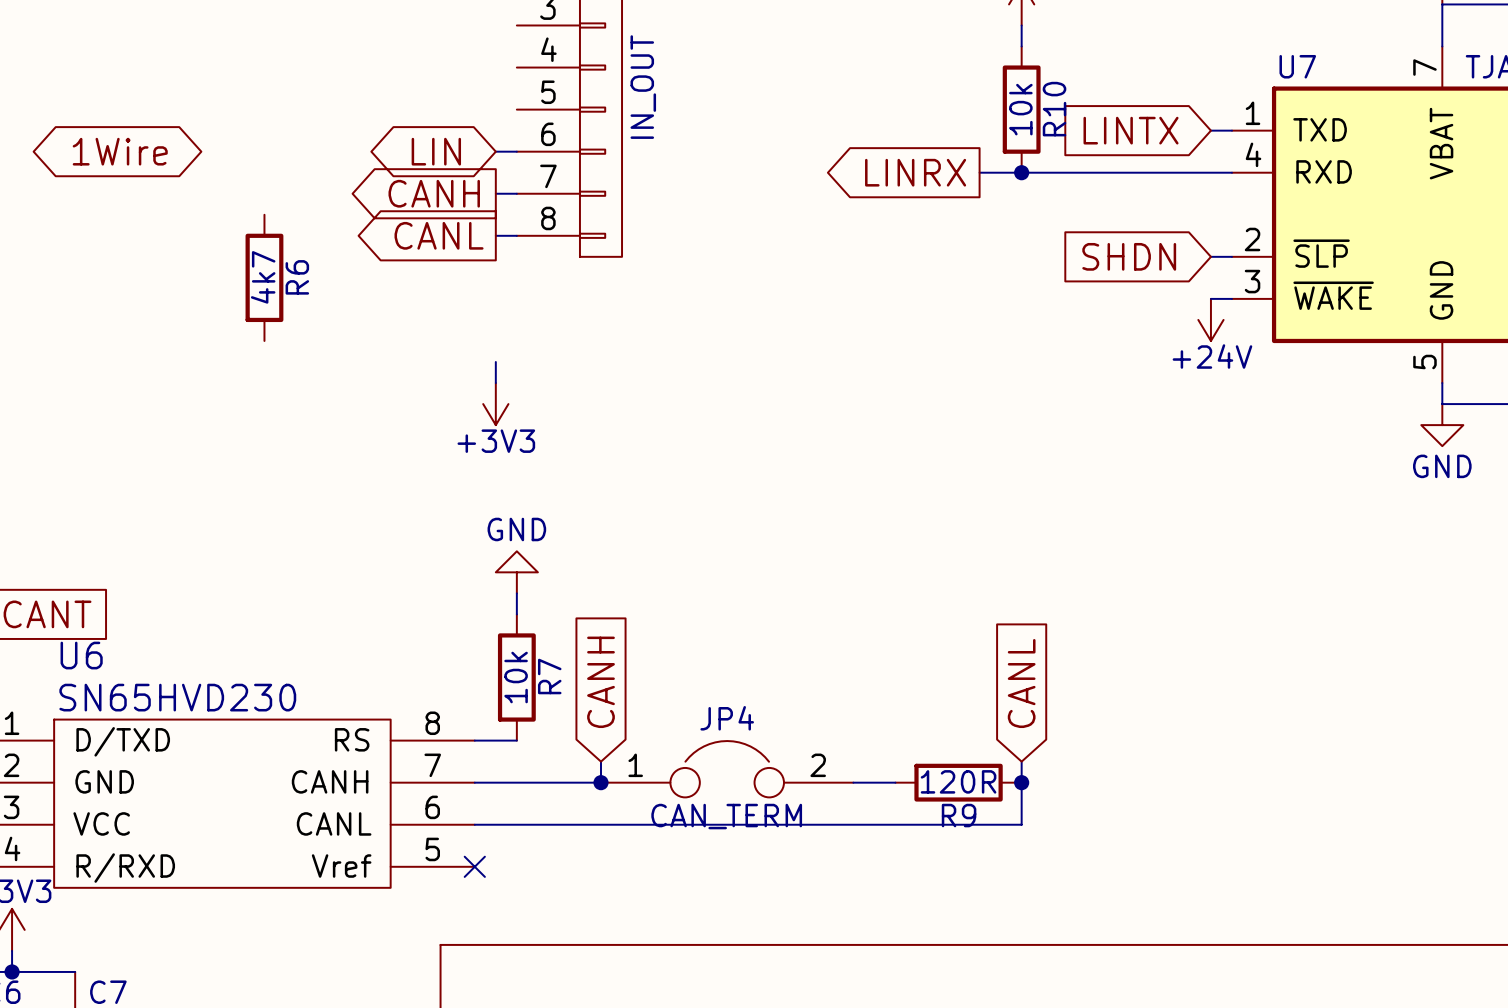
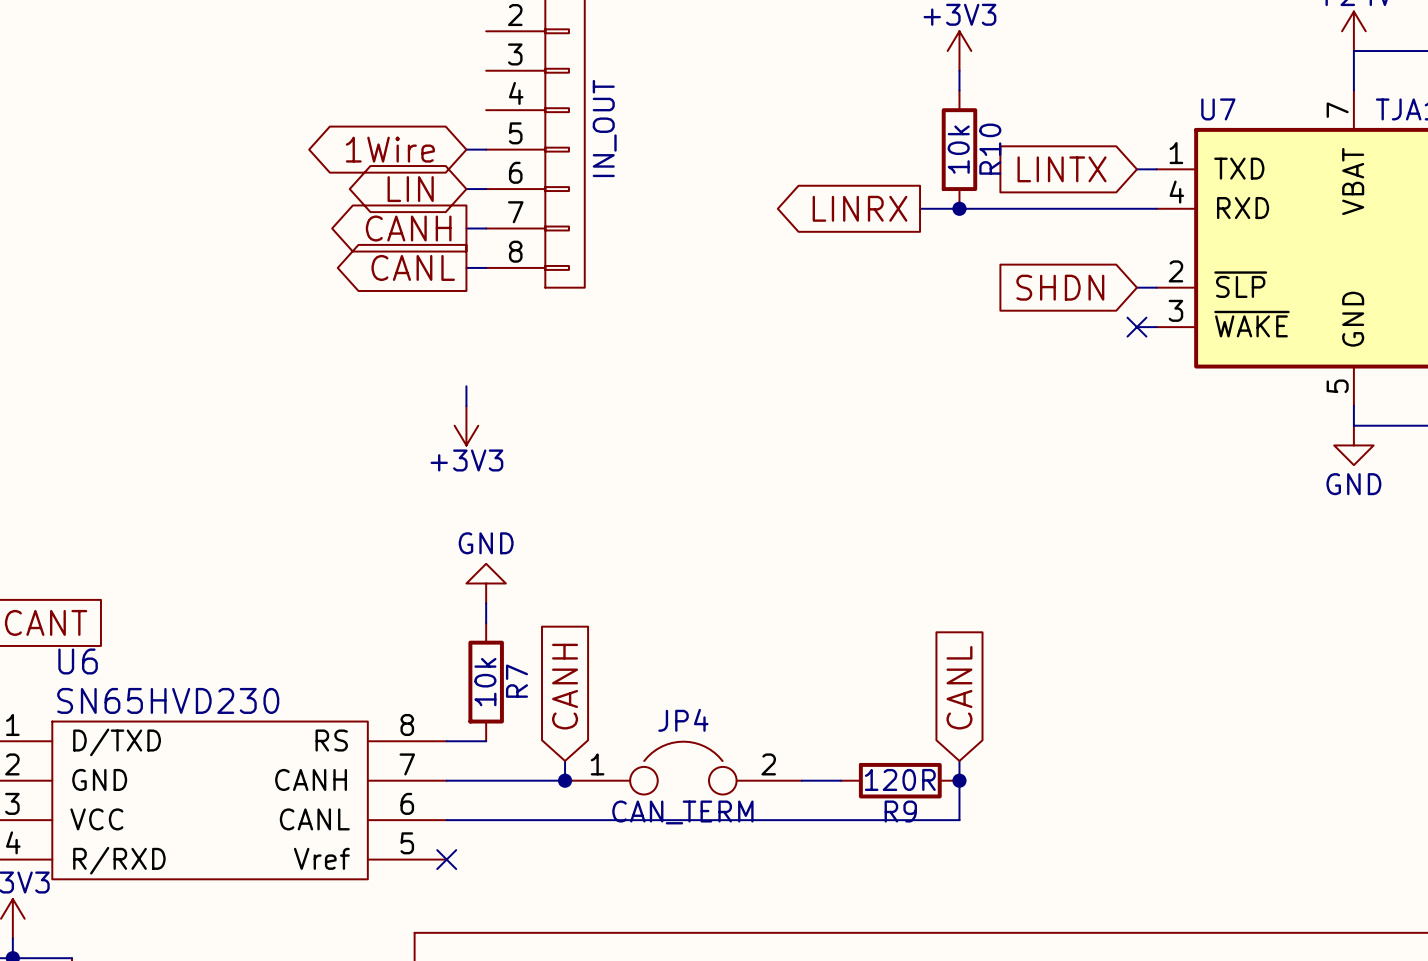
wire: none -> (466, 149) (486, 149)
global label position: 1Wire (120, 151) -> 1Wire (390, 149)
R6: 4k7 (264, 277) -> none
no-connect mark: none -> (1136, 327)
power symbol: +24V (1210, 319) -> none

